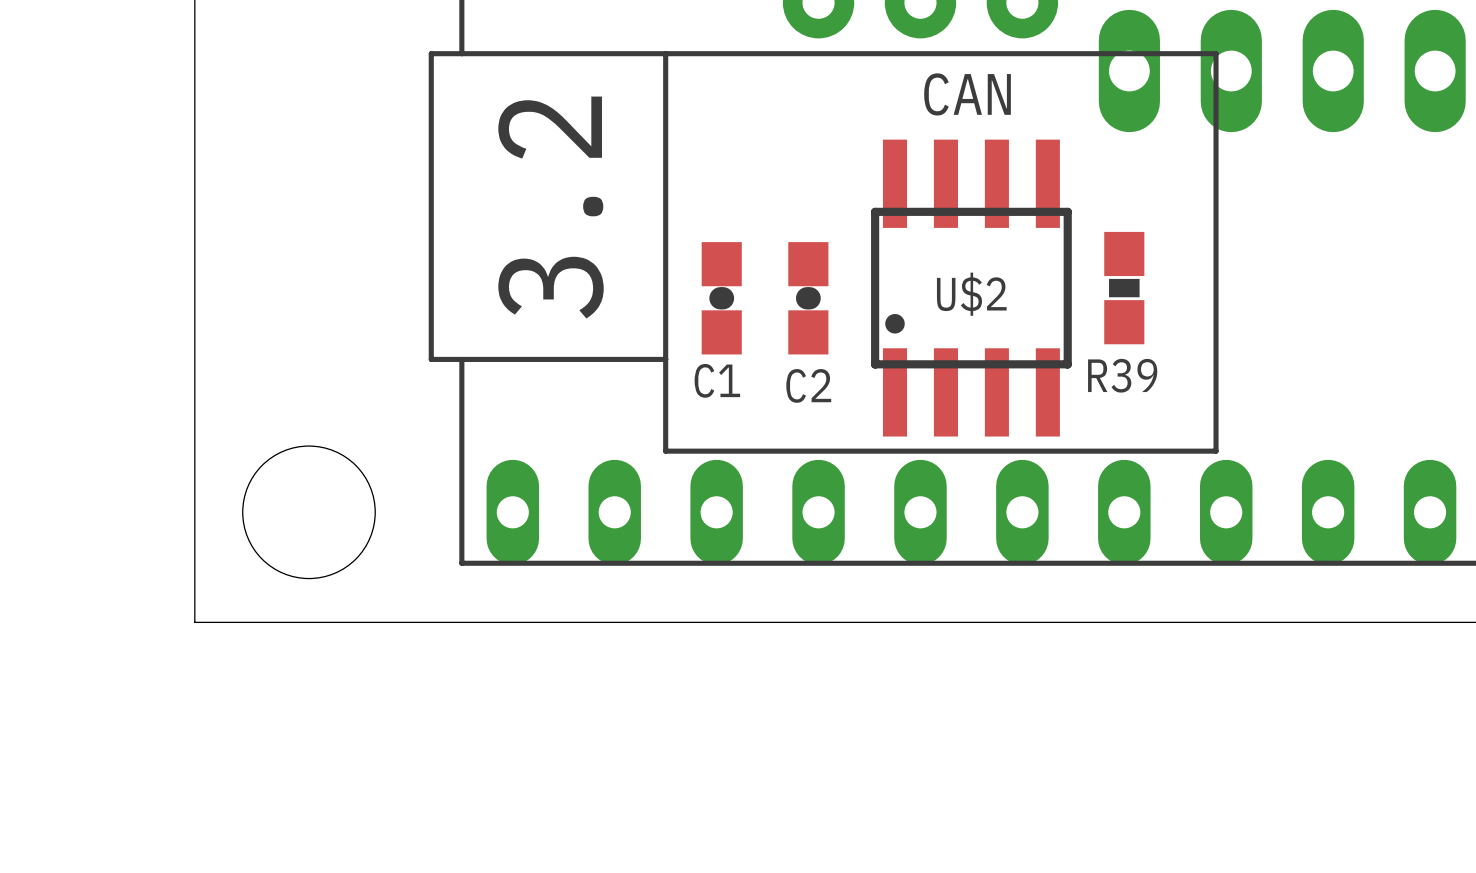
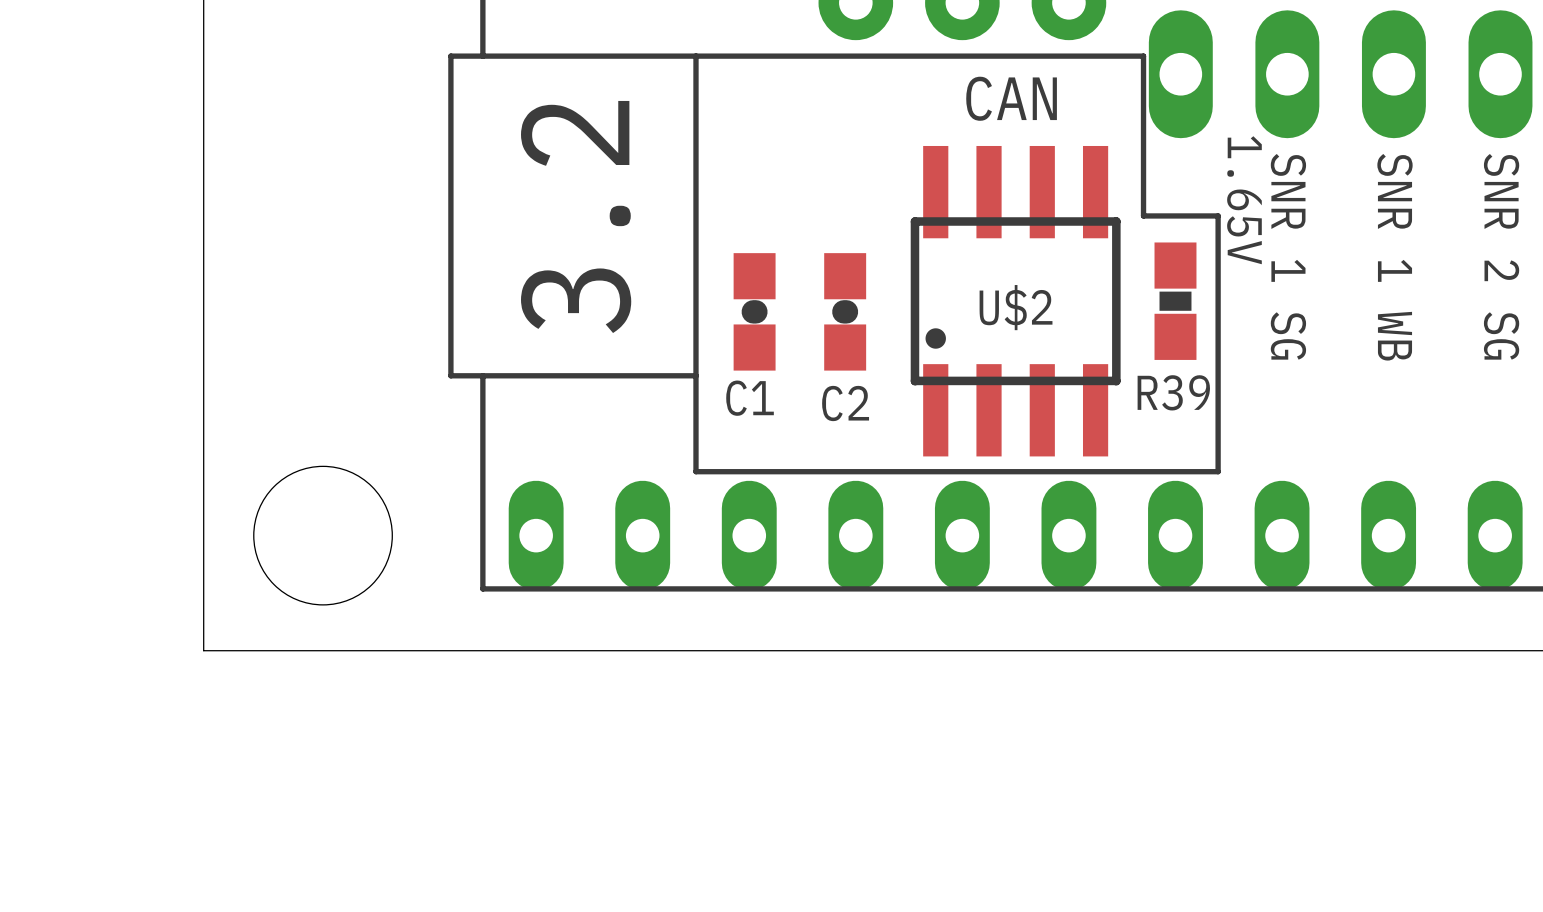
line: (1093, 53) (1216, 53) (1216, 451) (1165, 451) -> (1143, 56) (1143, 215) (1218, 215) (1218, 471)
text: none -> 1.65V (1244, 200)
text: none -> SNR 1 SG (1288, 256)
text: none -> SNR 2 SG (1501, 256)
text: none -> SNR 1 WB (1395, 257)

